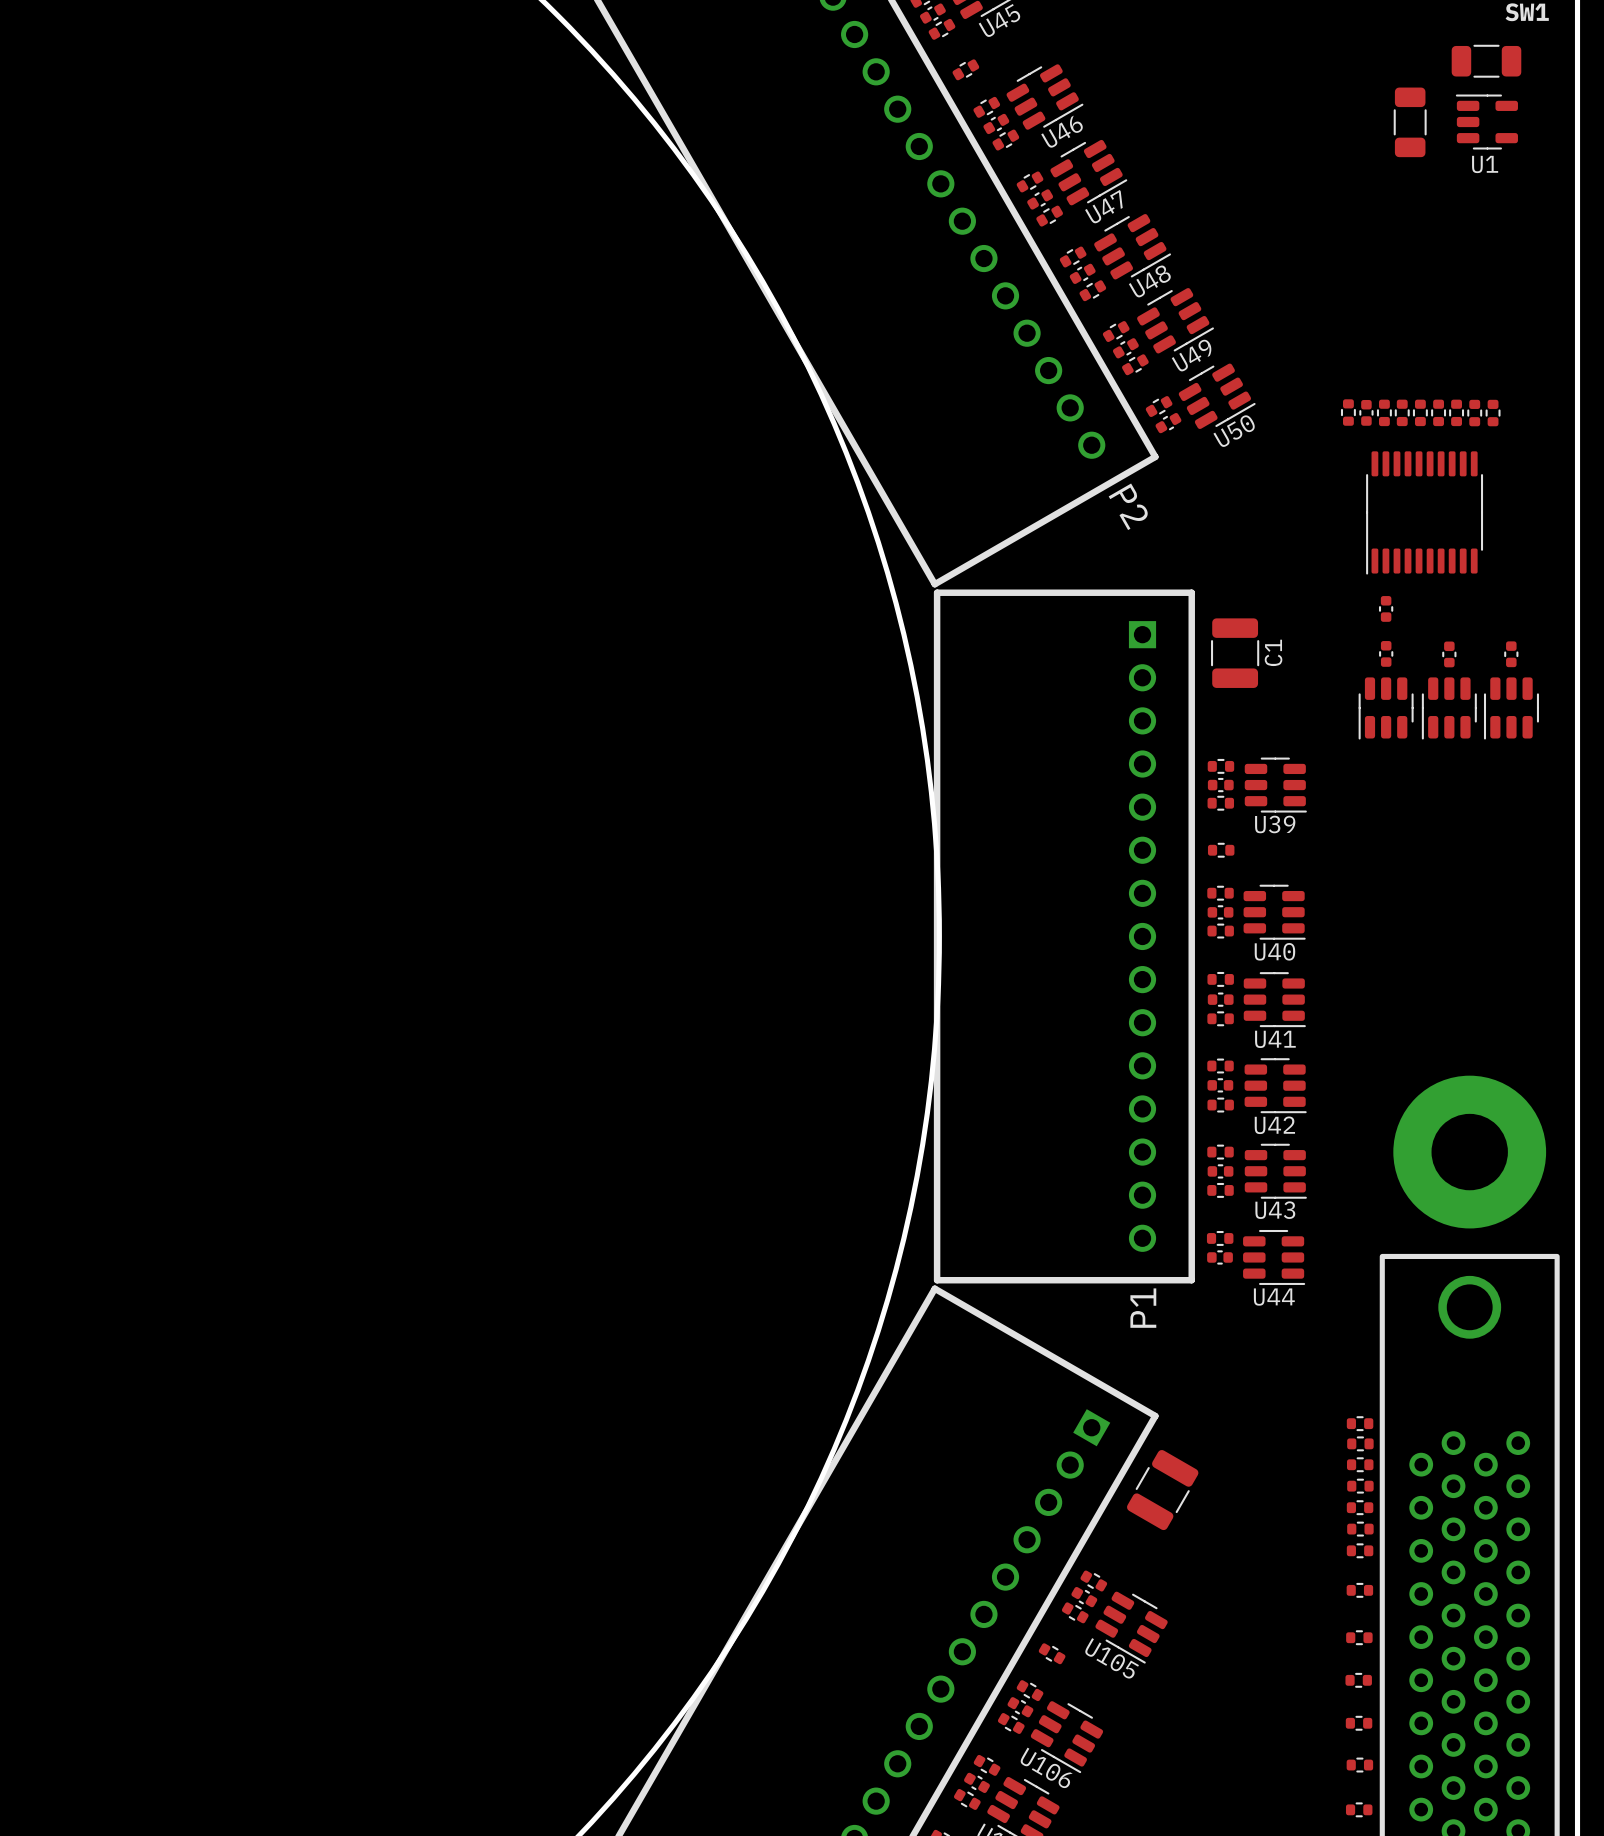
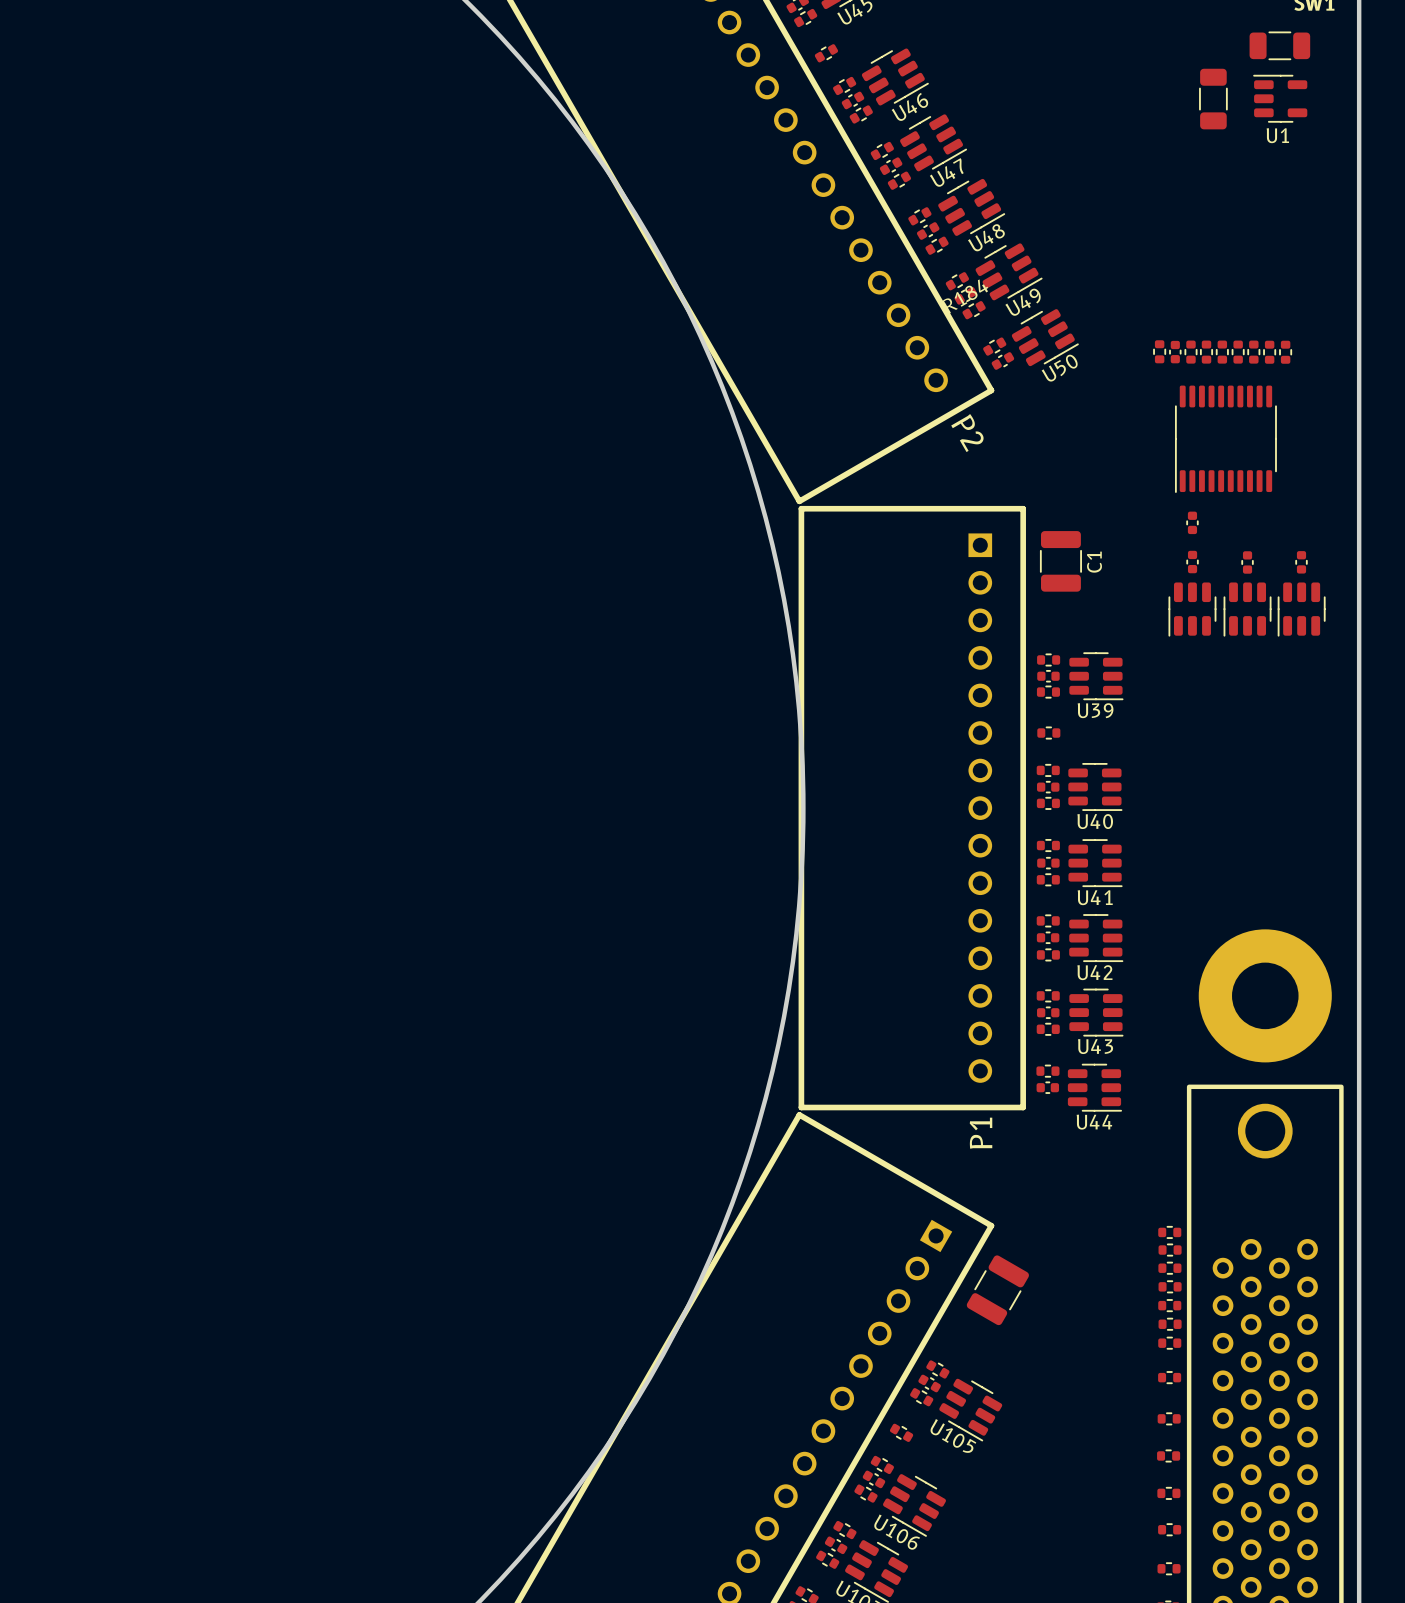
R184 name: none -> R184 (964, 296)

